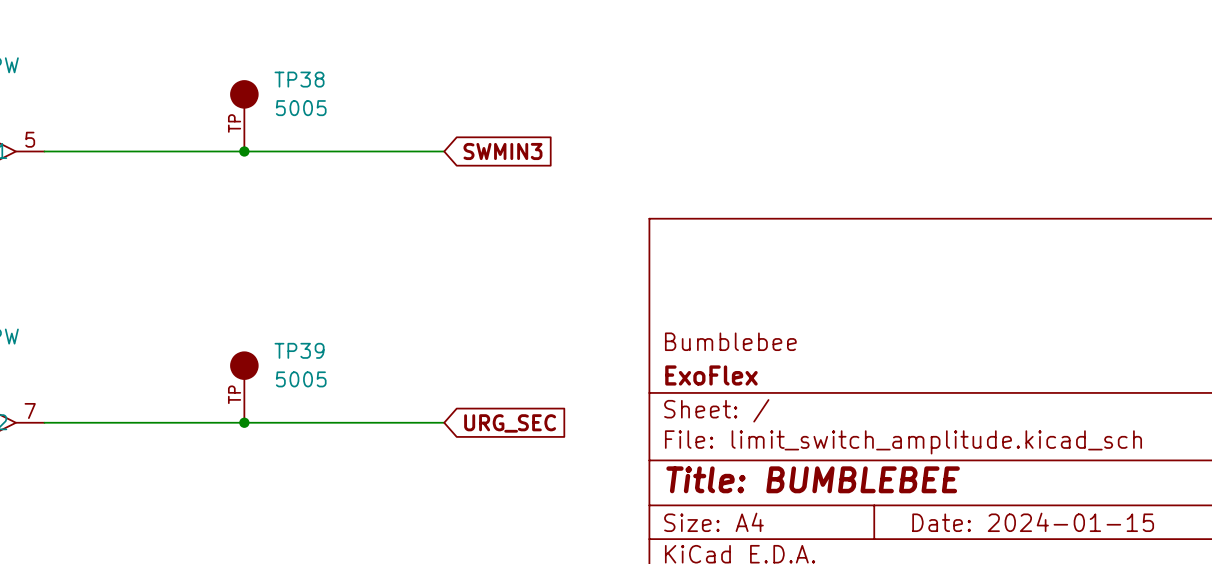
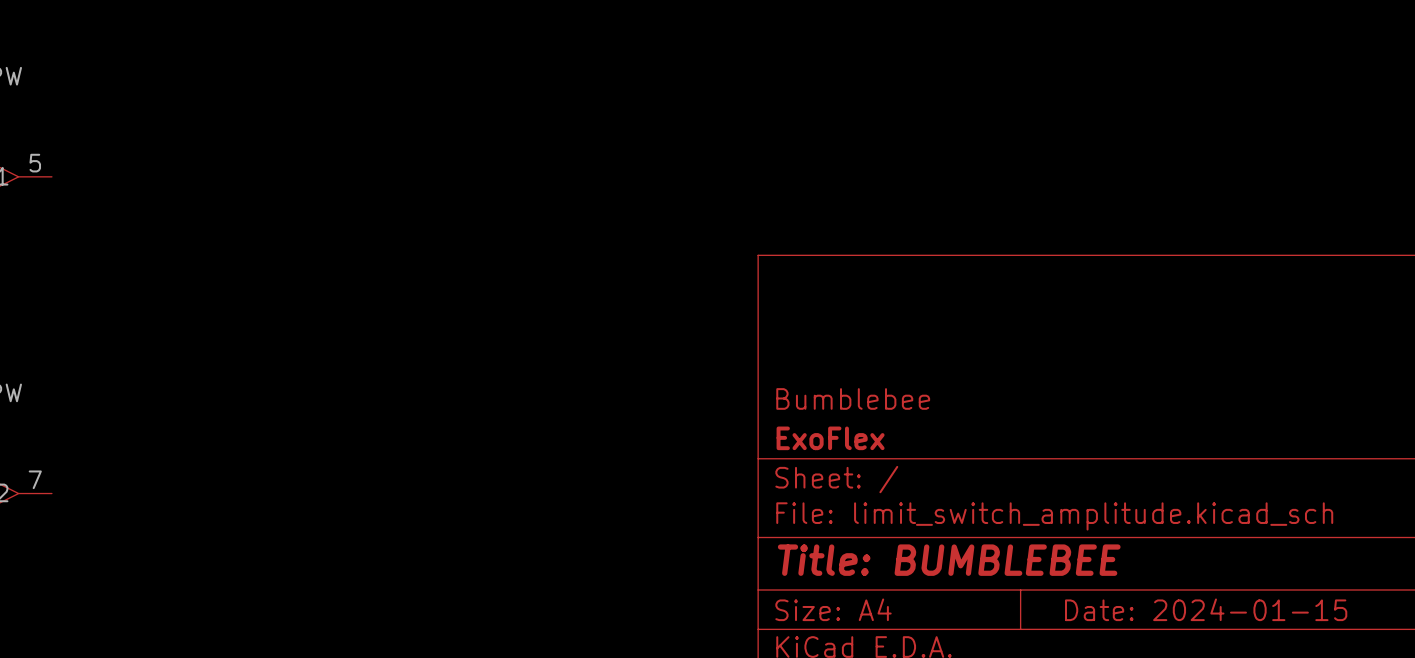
TP38: 5005 (244, 115) -> none
wire: (44, 151) (444, 151) -> none
junction: (244, 151) -> none
global label: SWMIN3 (502, 151) -> none
TP39: 5005 (244, 387) -> none
wire: (44, 422) (444, 422) -> none
junction: (244, 422) -> none
global label: URG_SEC (510, 423) -> none

